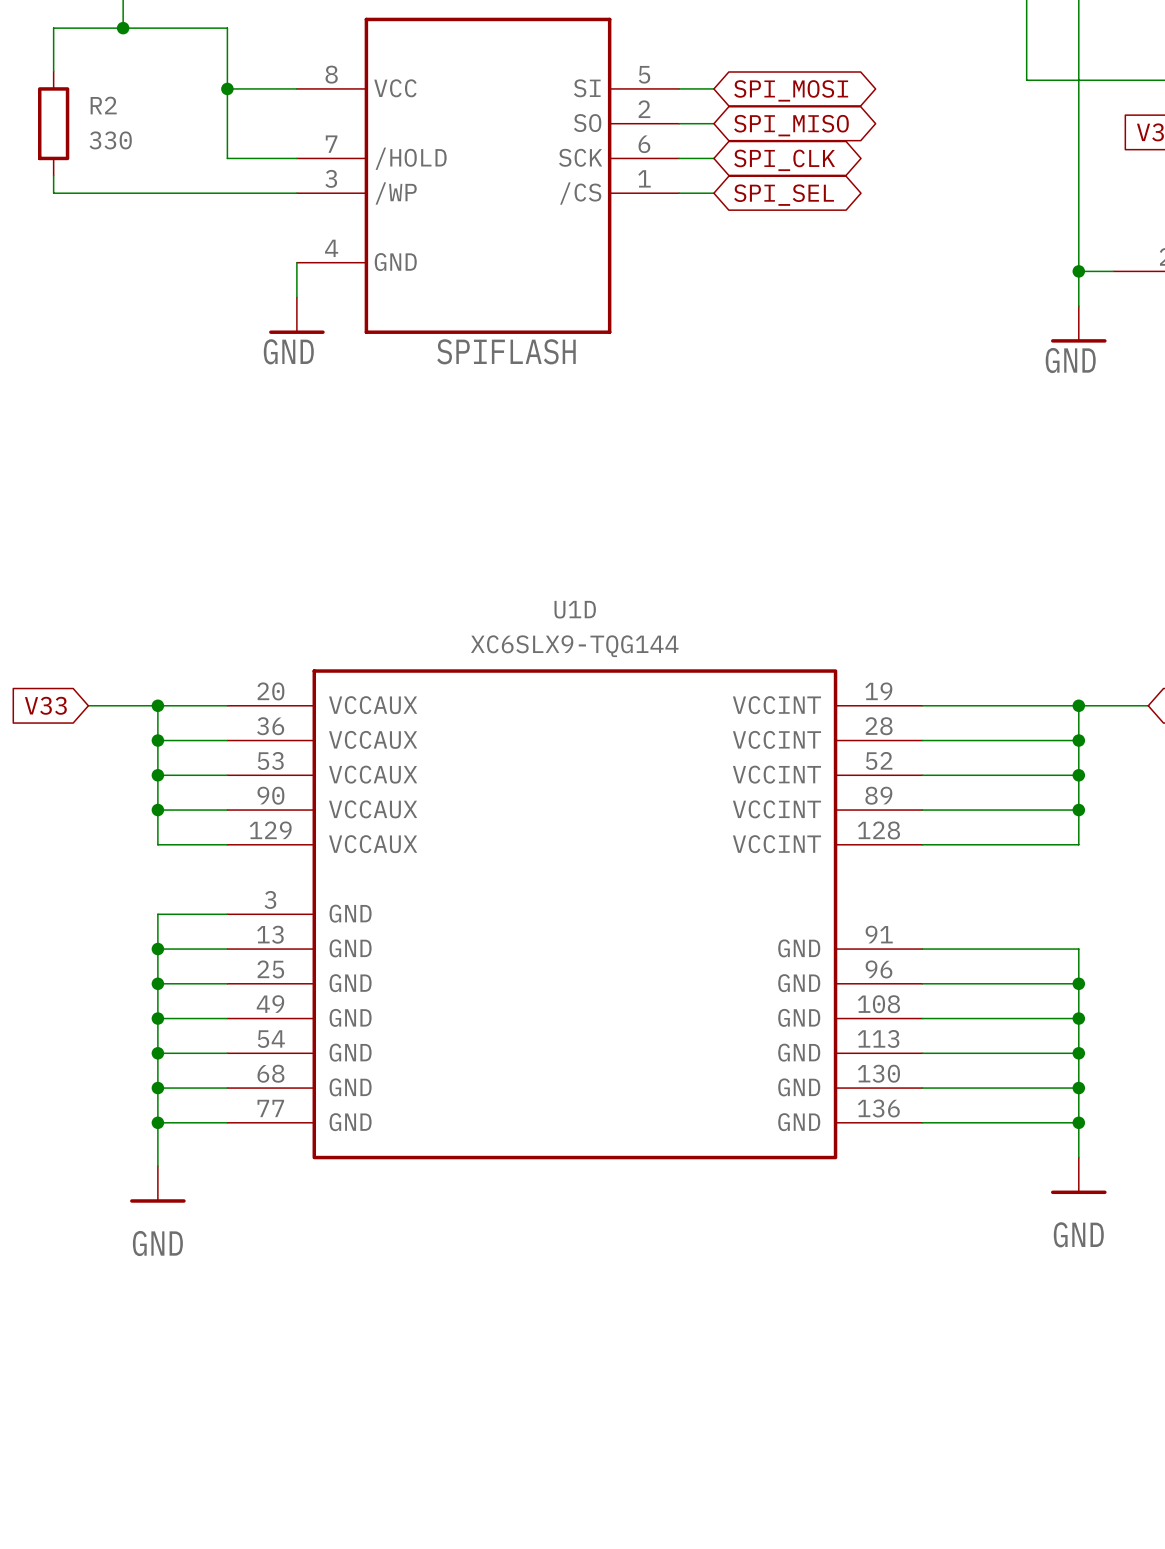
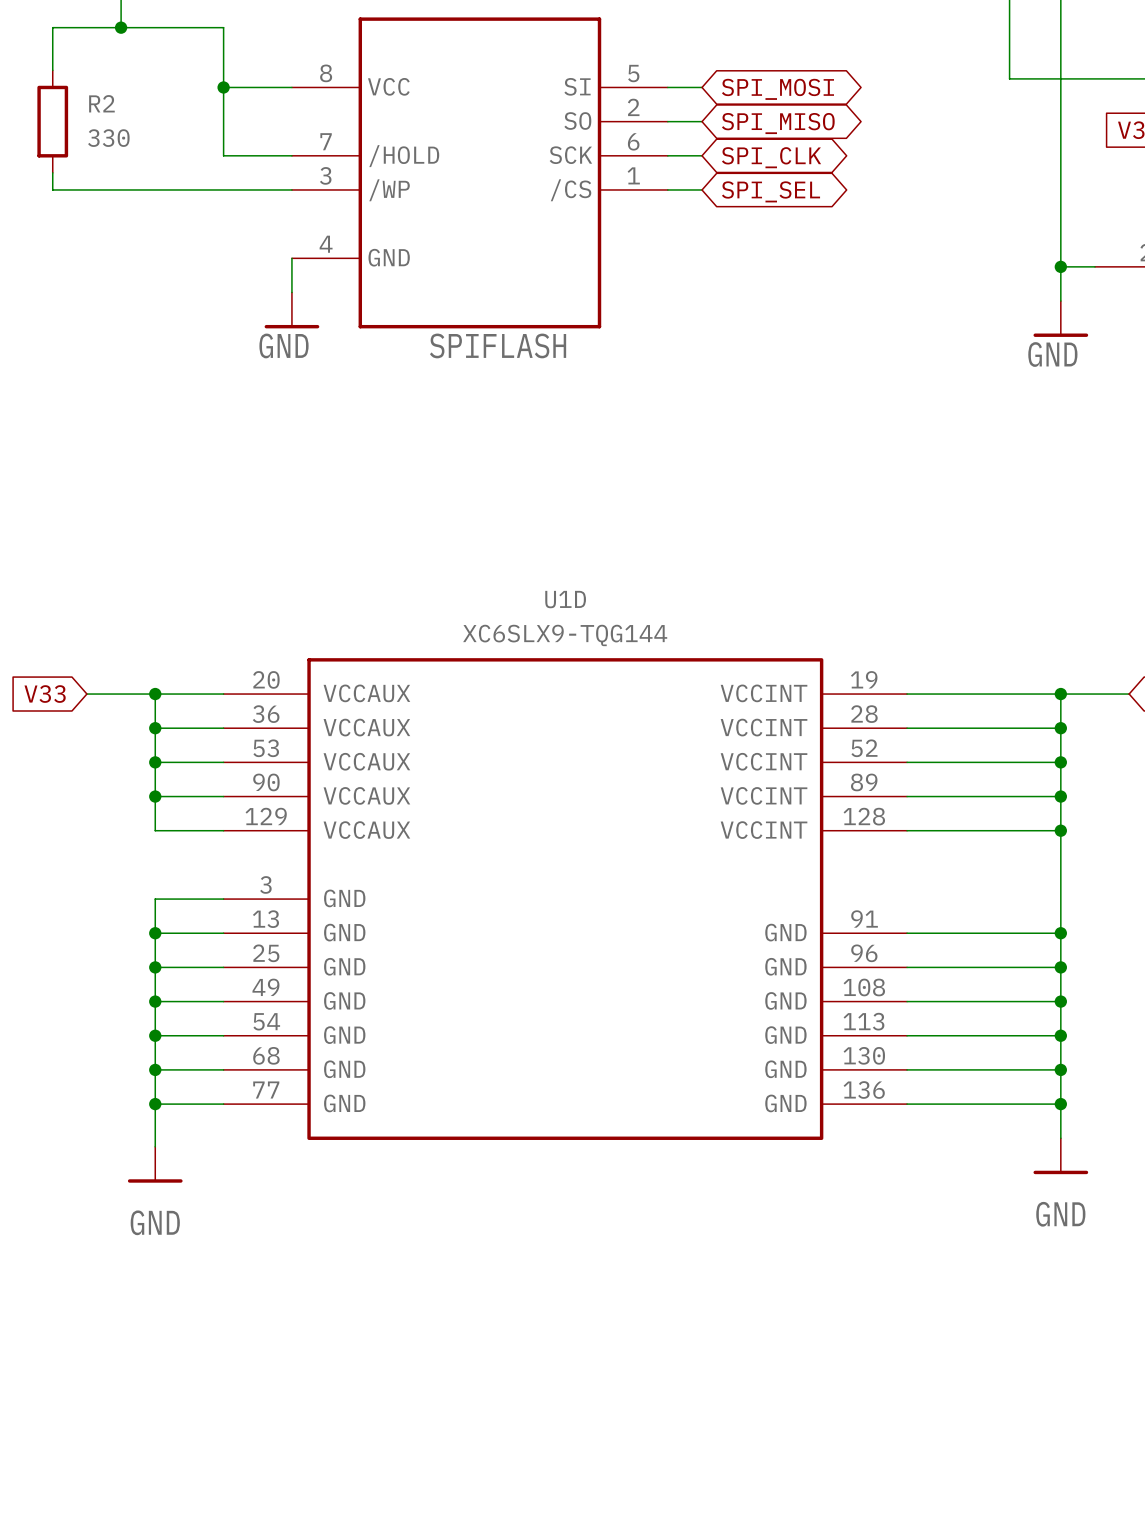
wire: none -> (1060, 830) (1060, 933)
junction: none -> (1060, 830)
junction: none -> (1060, 933)

